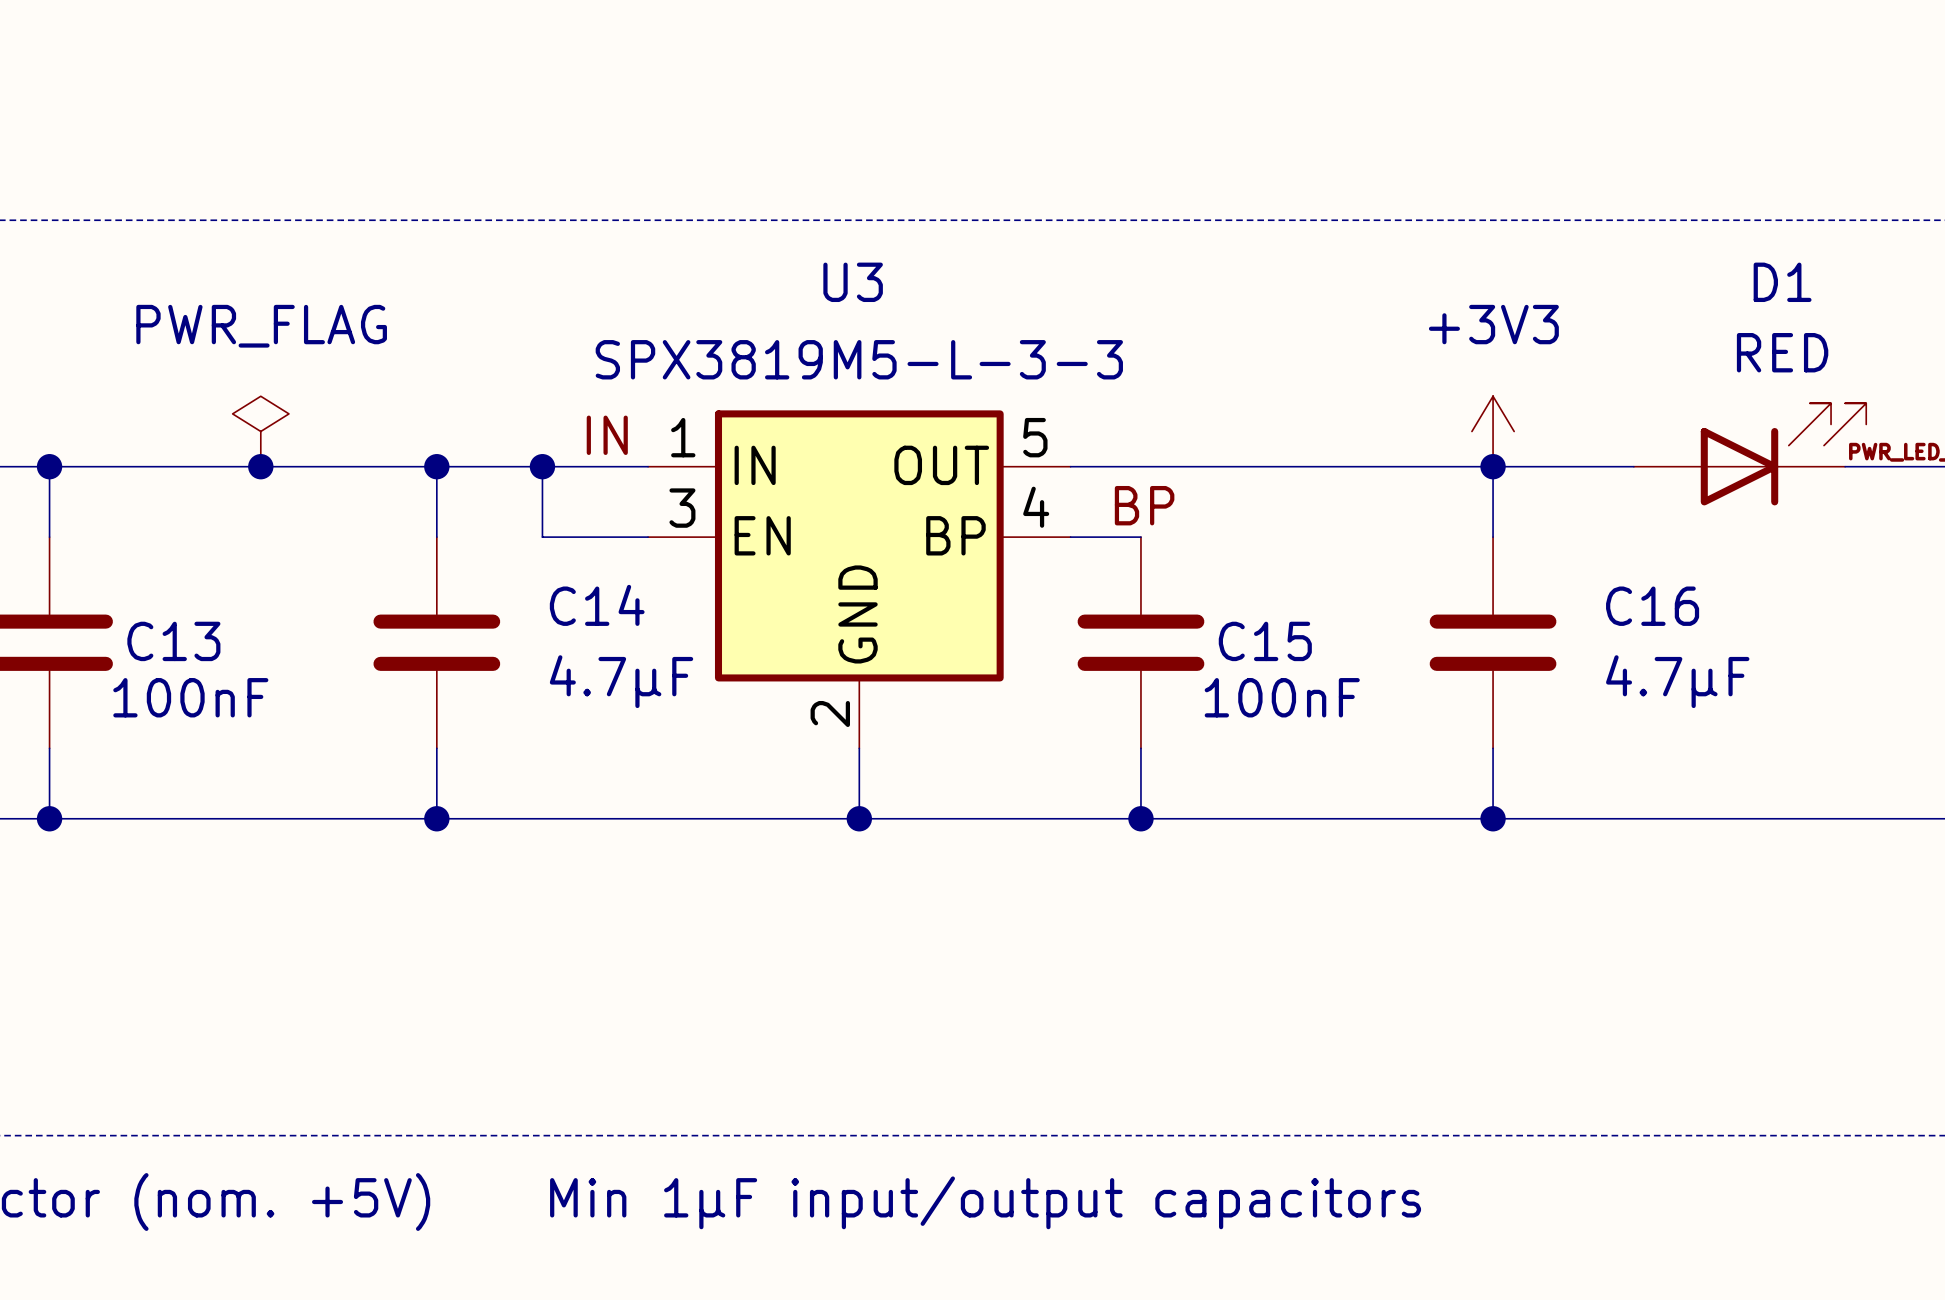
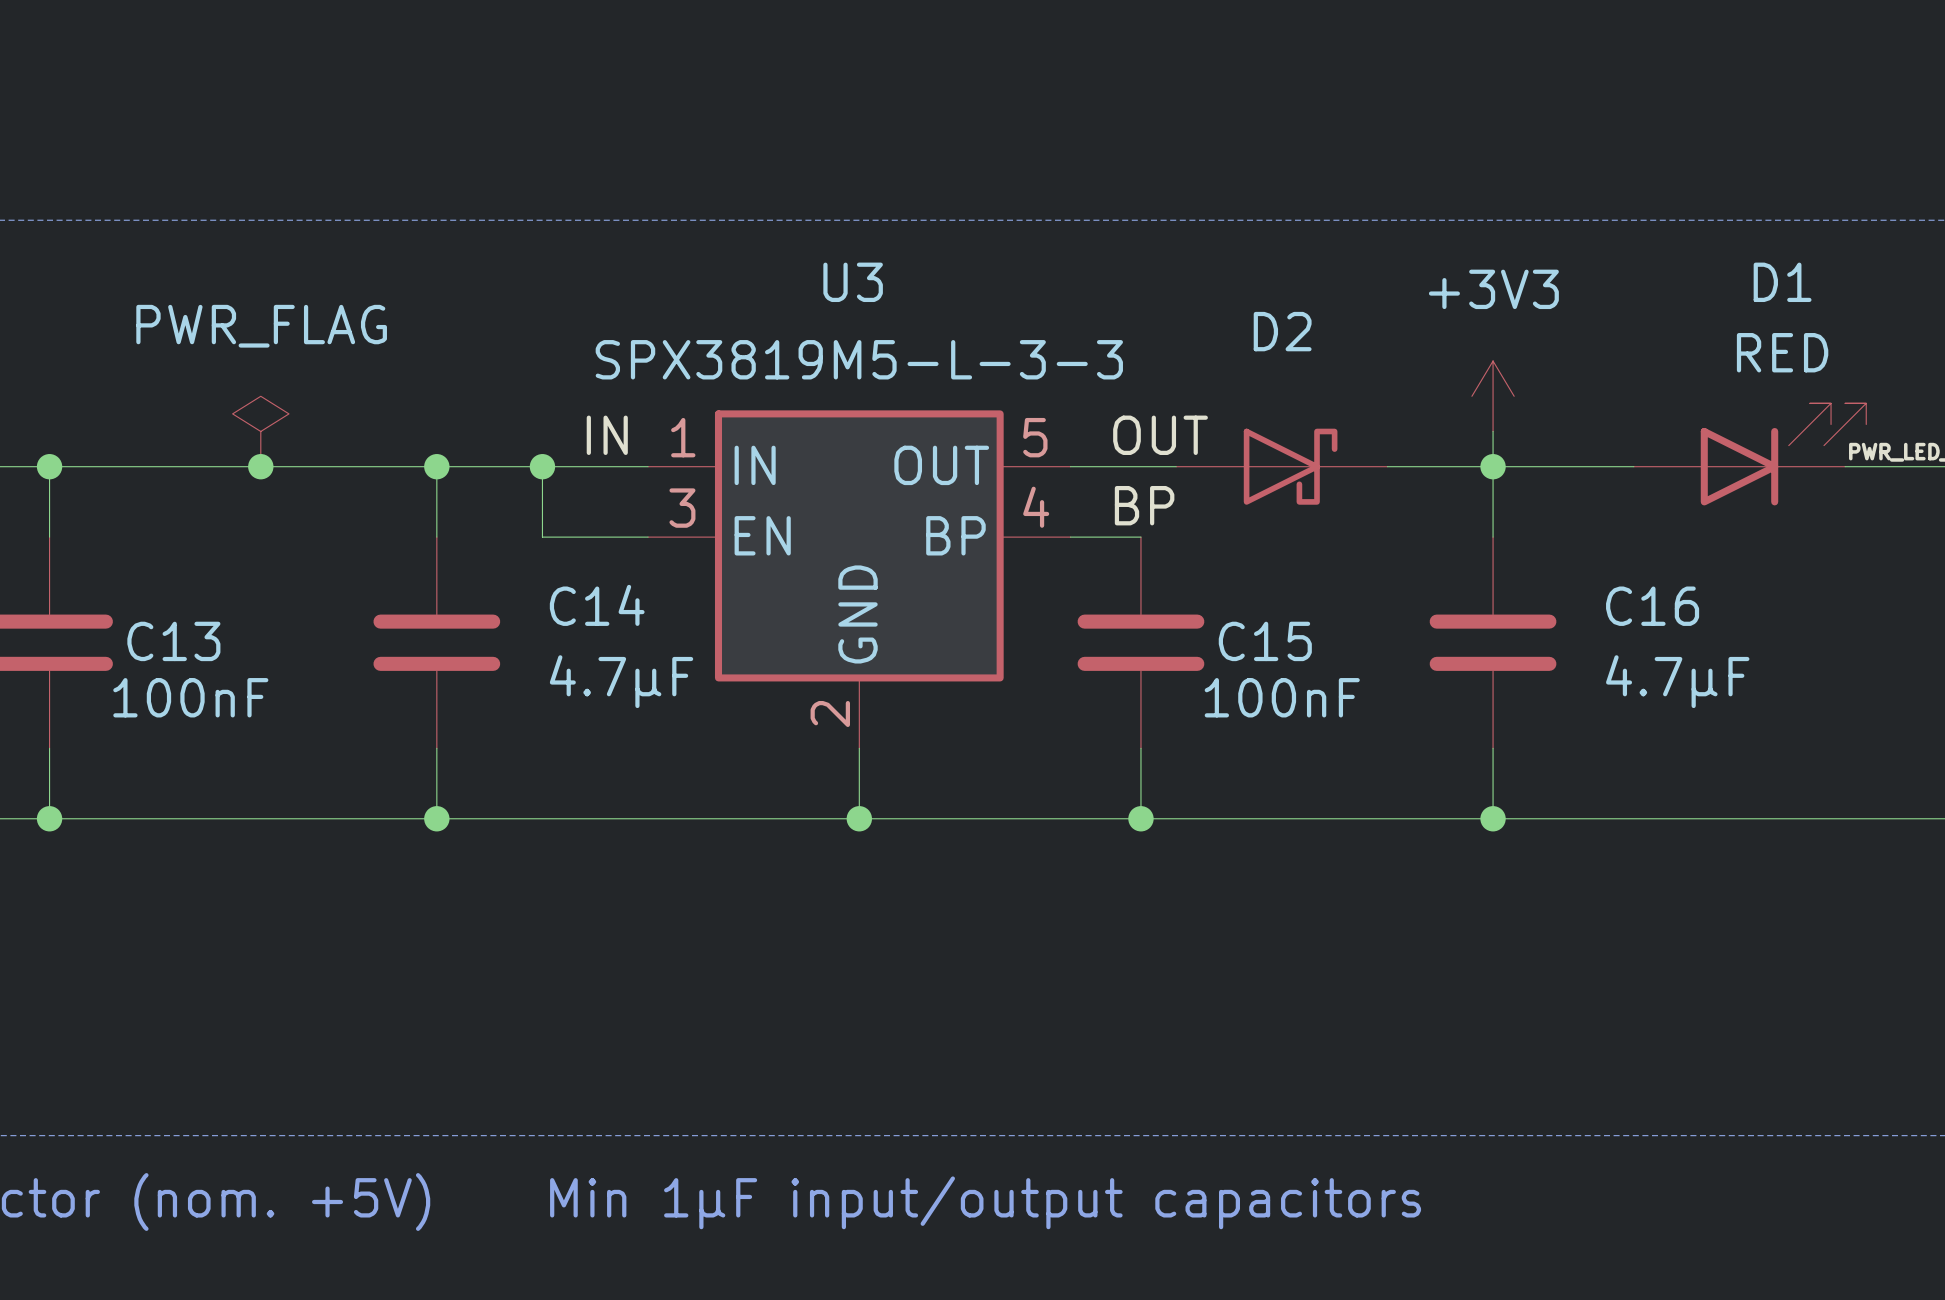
power symbol position: +3V3 (1493, 431) -> +3V3 (1493, 396)
label: none -> OUT (1160, 435)
D2: none -> (1281, 466)

